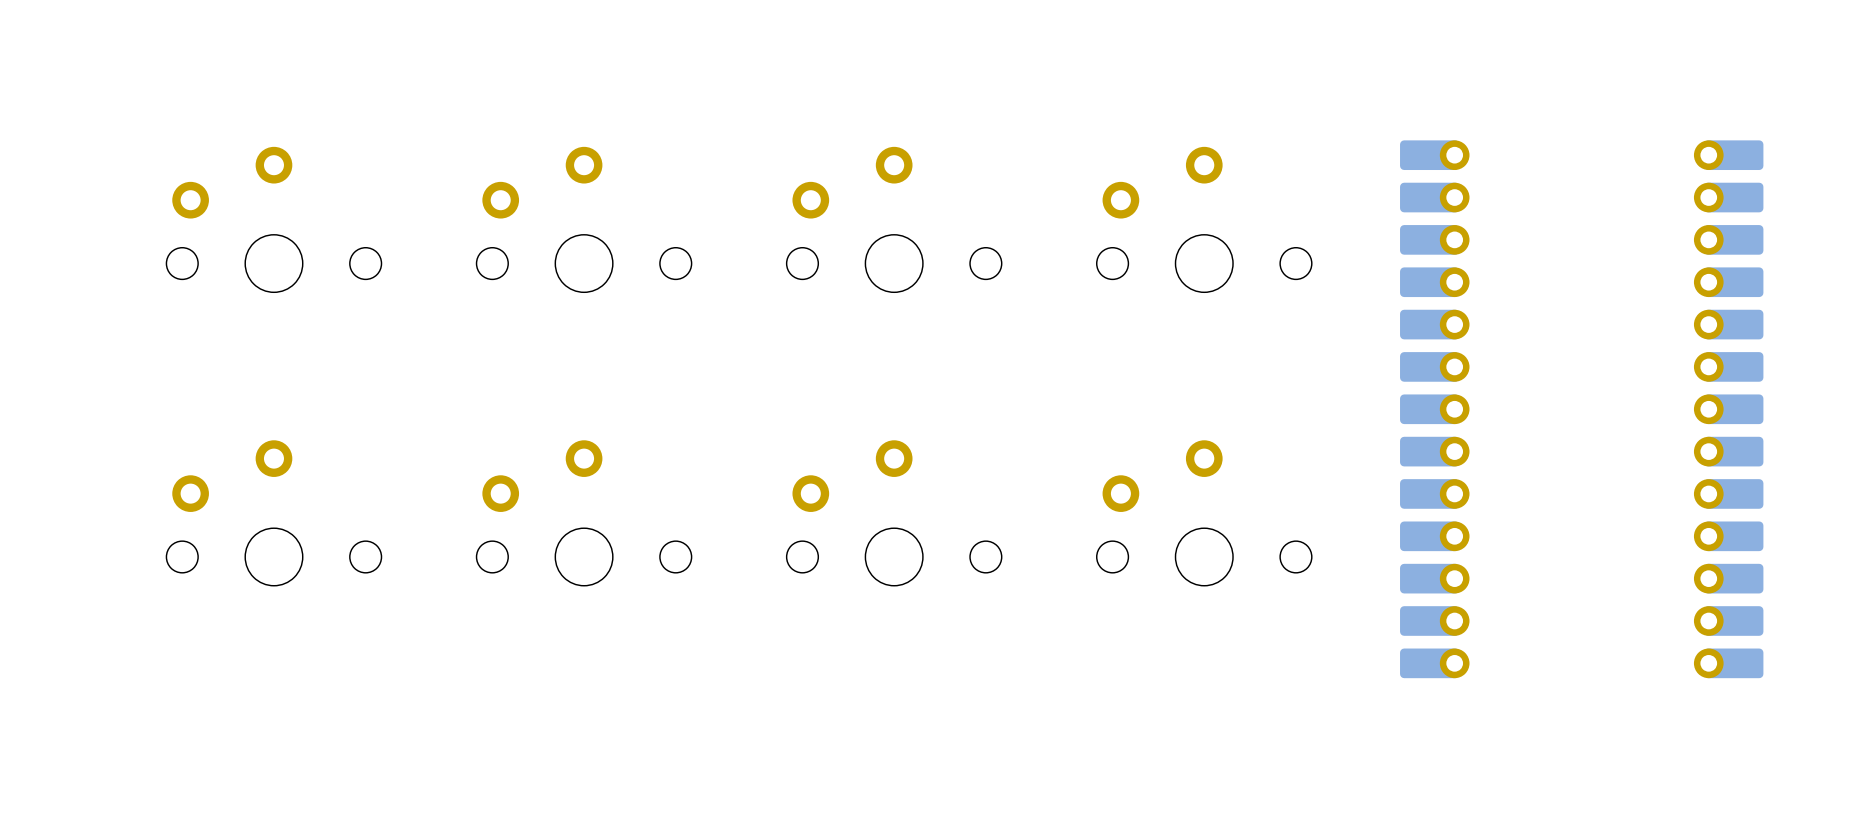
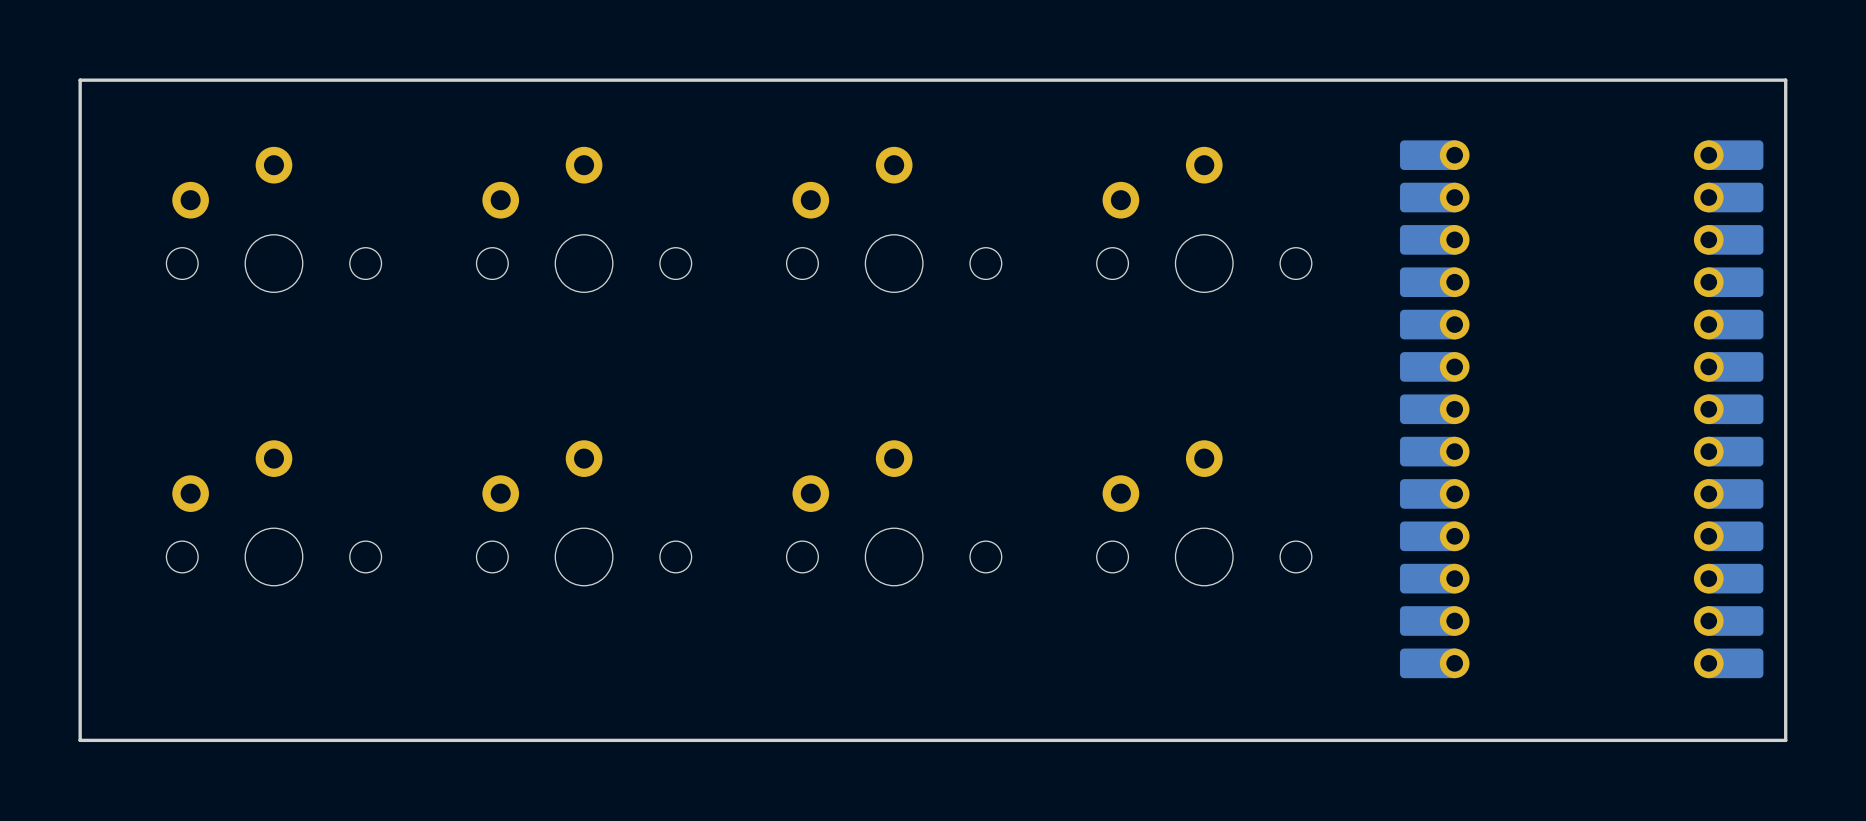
board edge: none -> (1785, 80) (80, 80) (80, 740) (1785, 740) (1785, 80)

